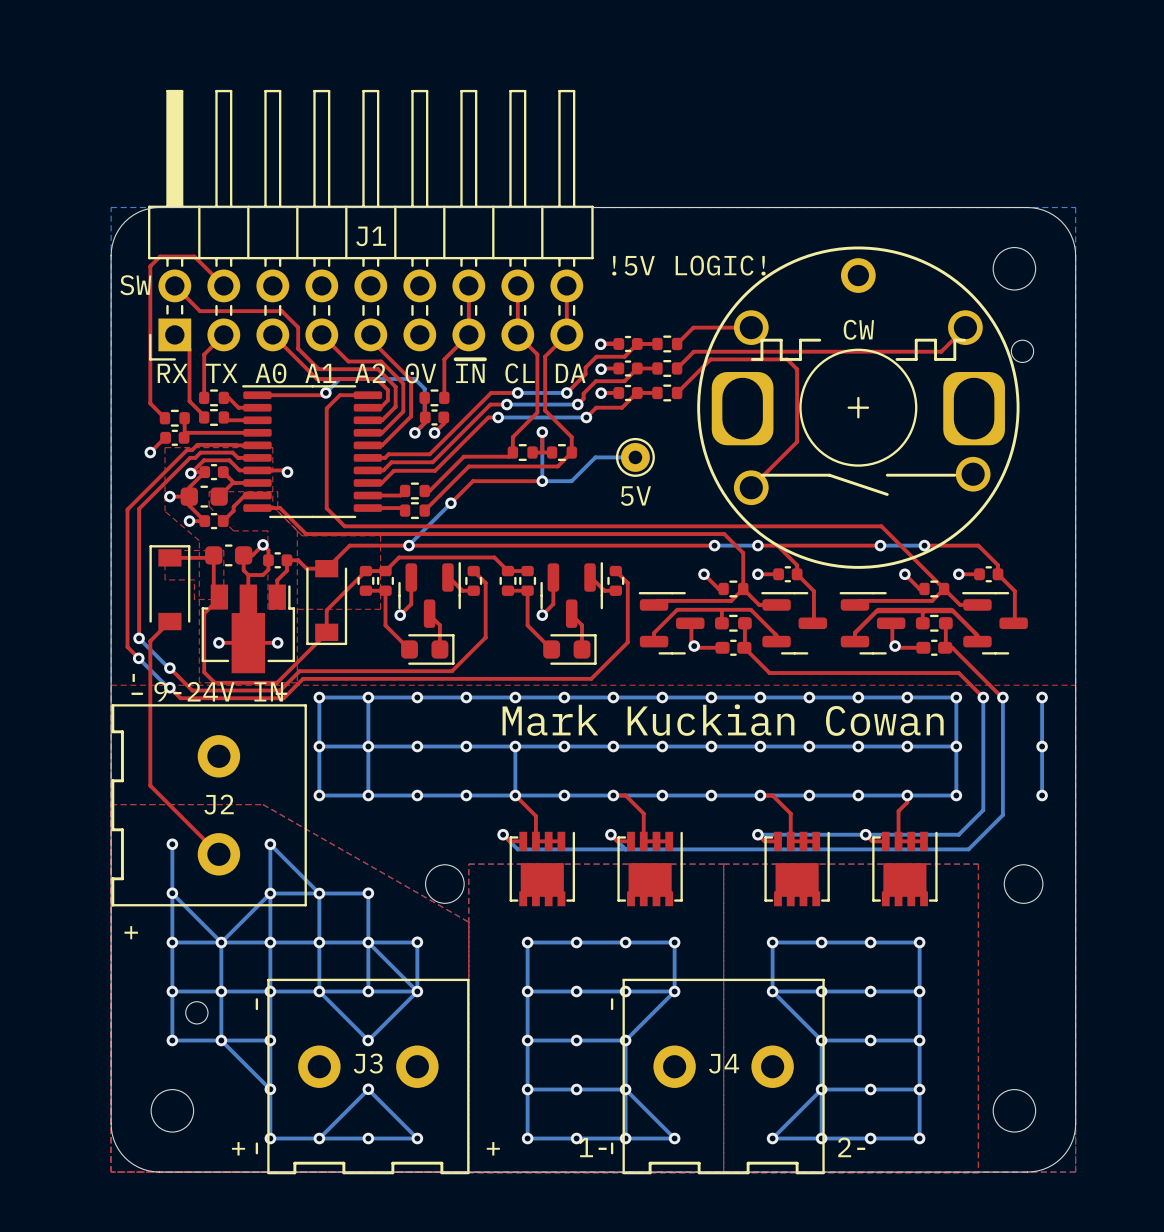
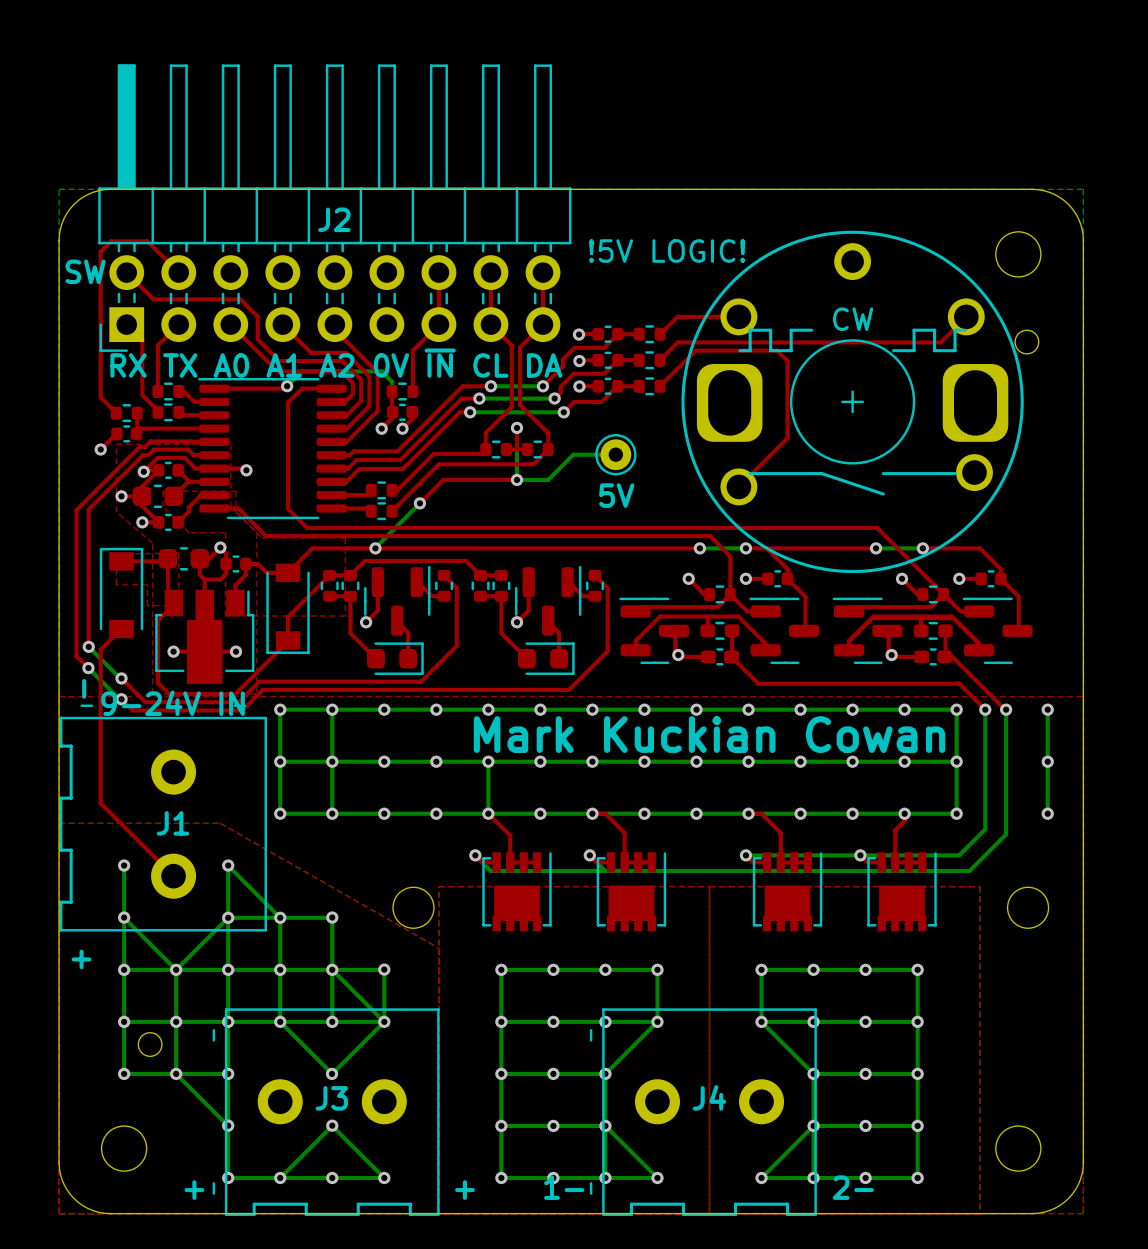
J1 name: J1 (371, 236) -> J2 (334, 219)
J2 name: J2 (219, 804) -> J1 (173, 823)

